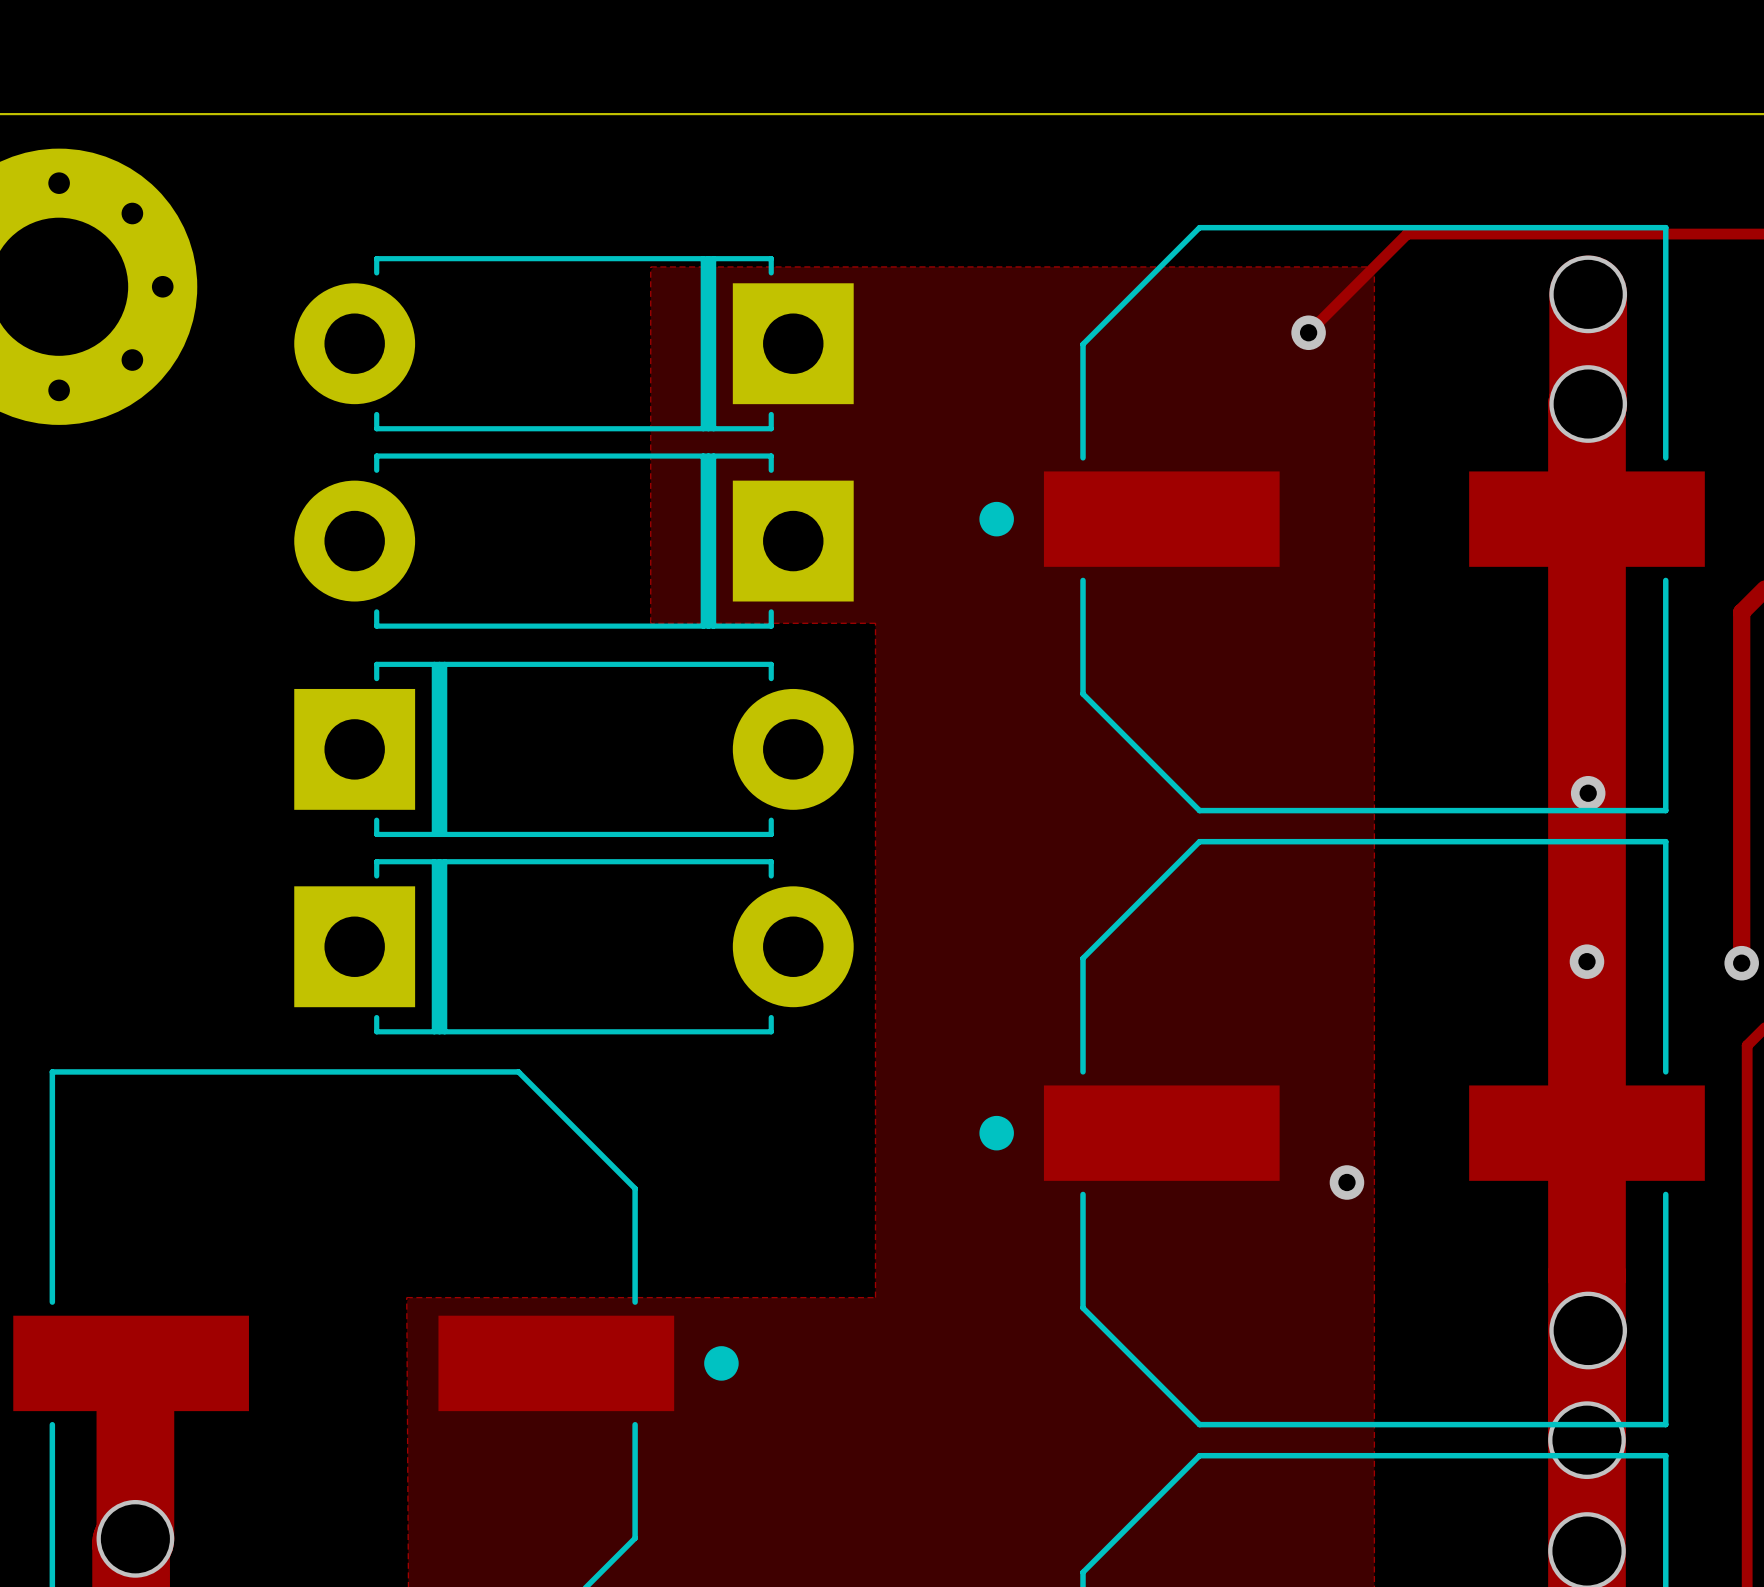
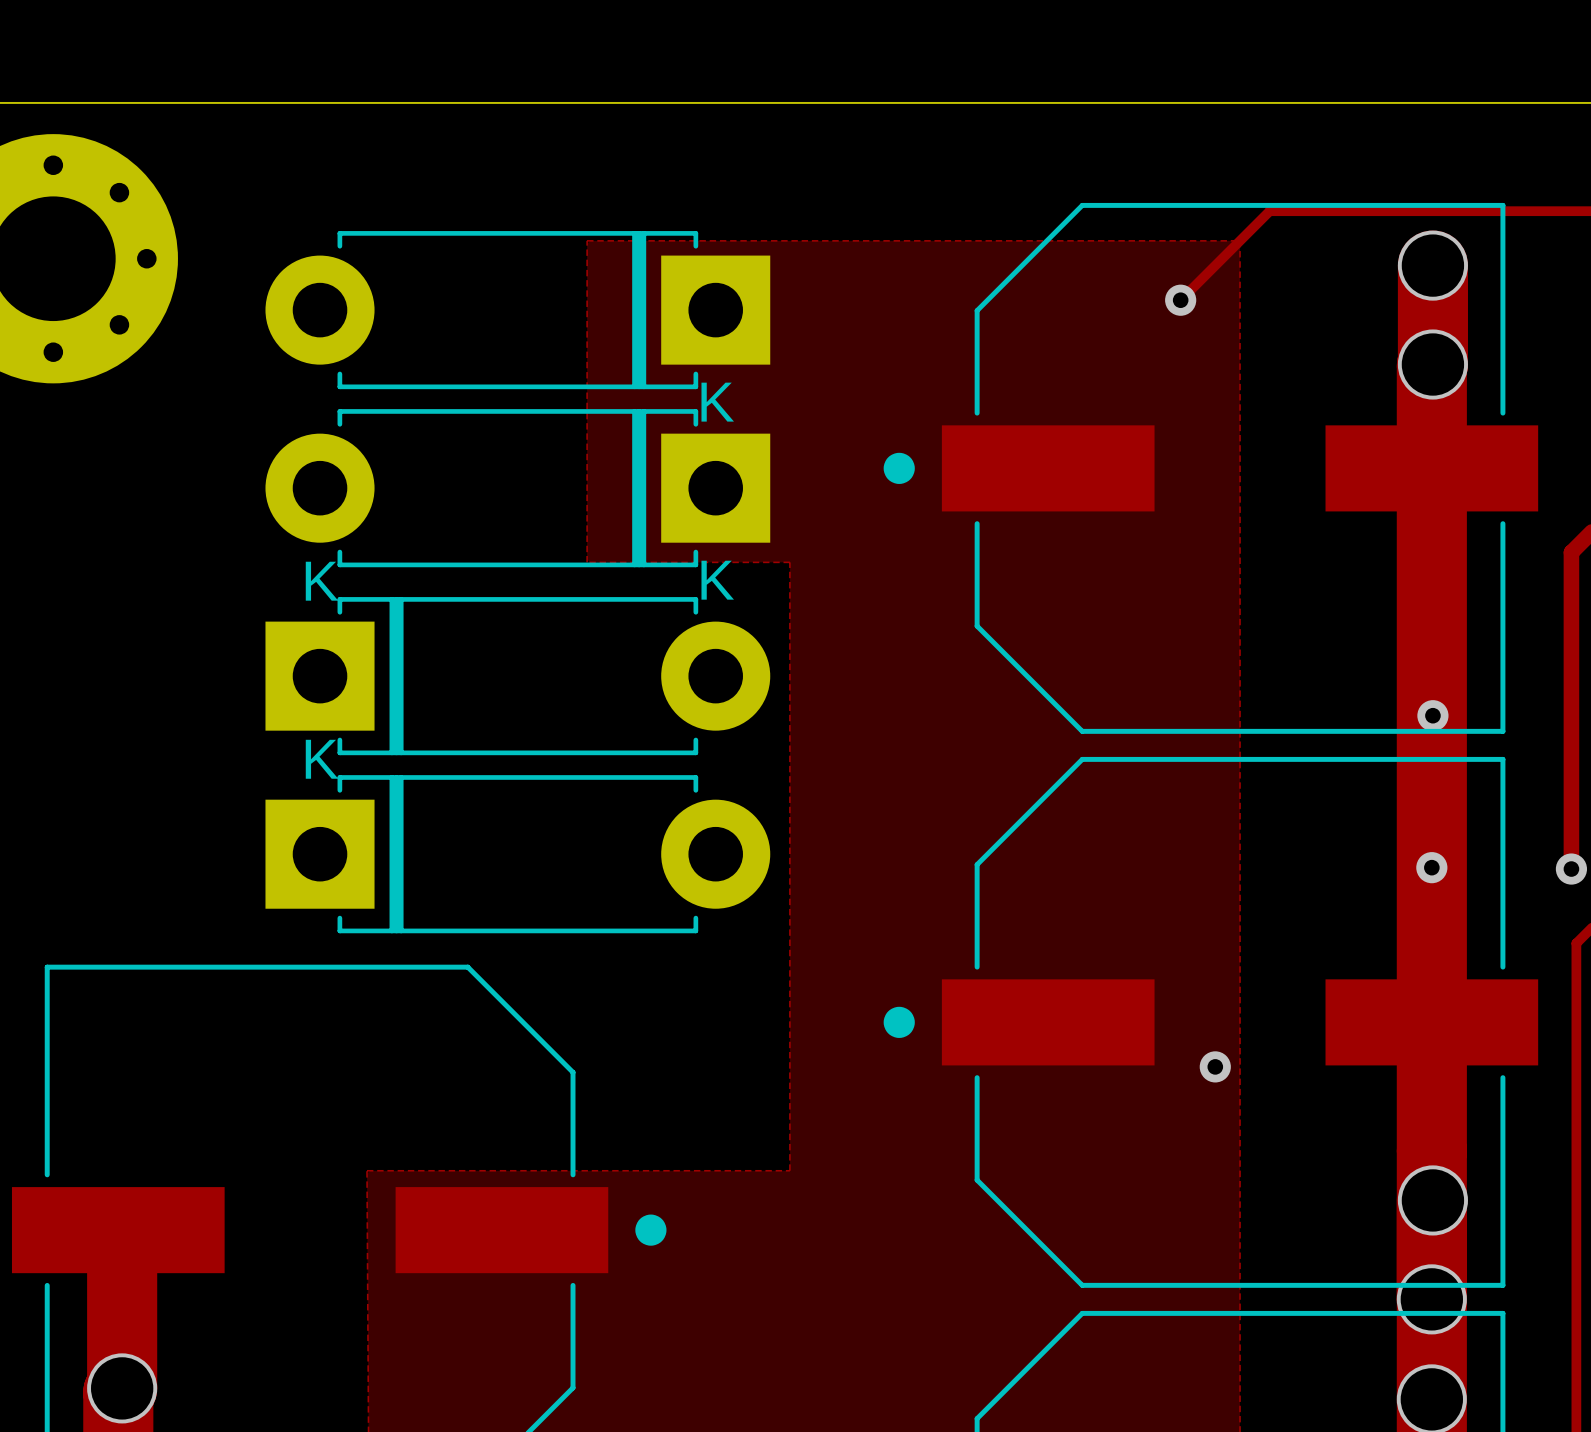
part text: none -> K (717, 402)
part text: none -> K (717, 580)
part text: none -> K (322, 581)
part text: none -> K (322, 759)

